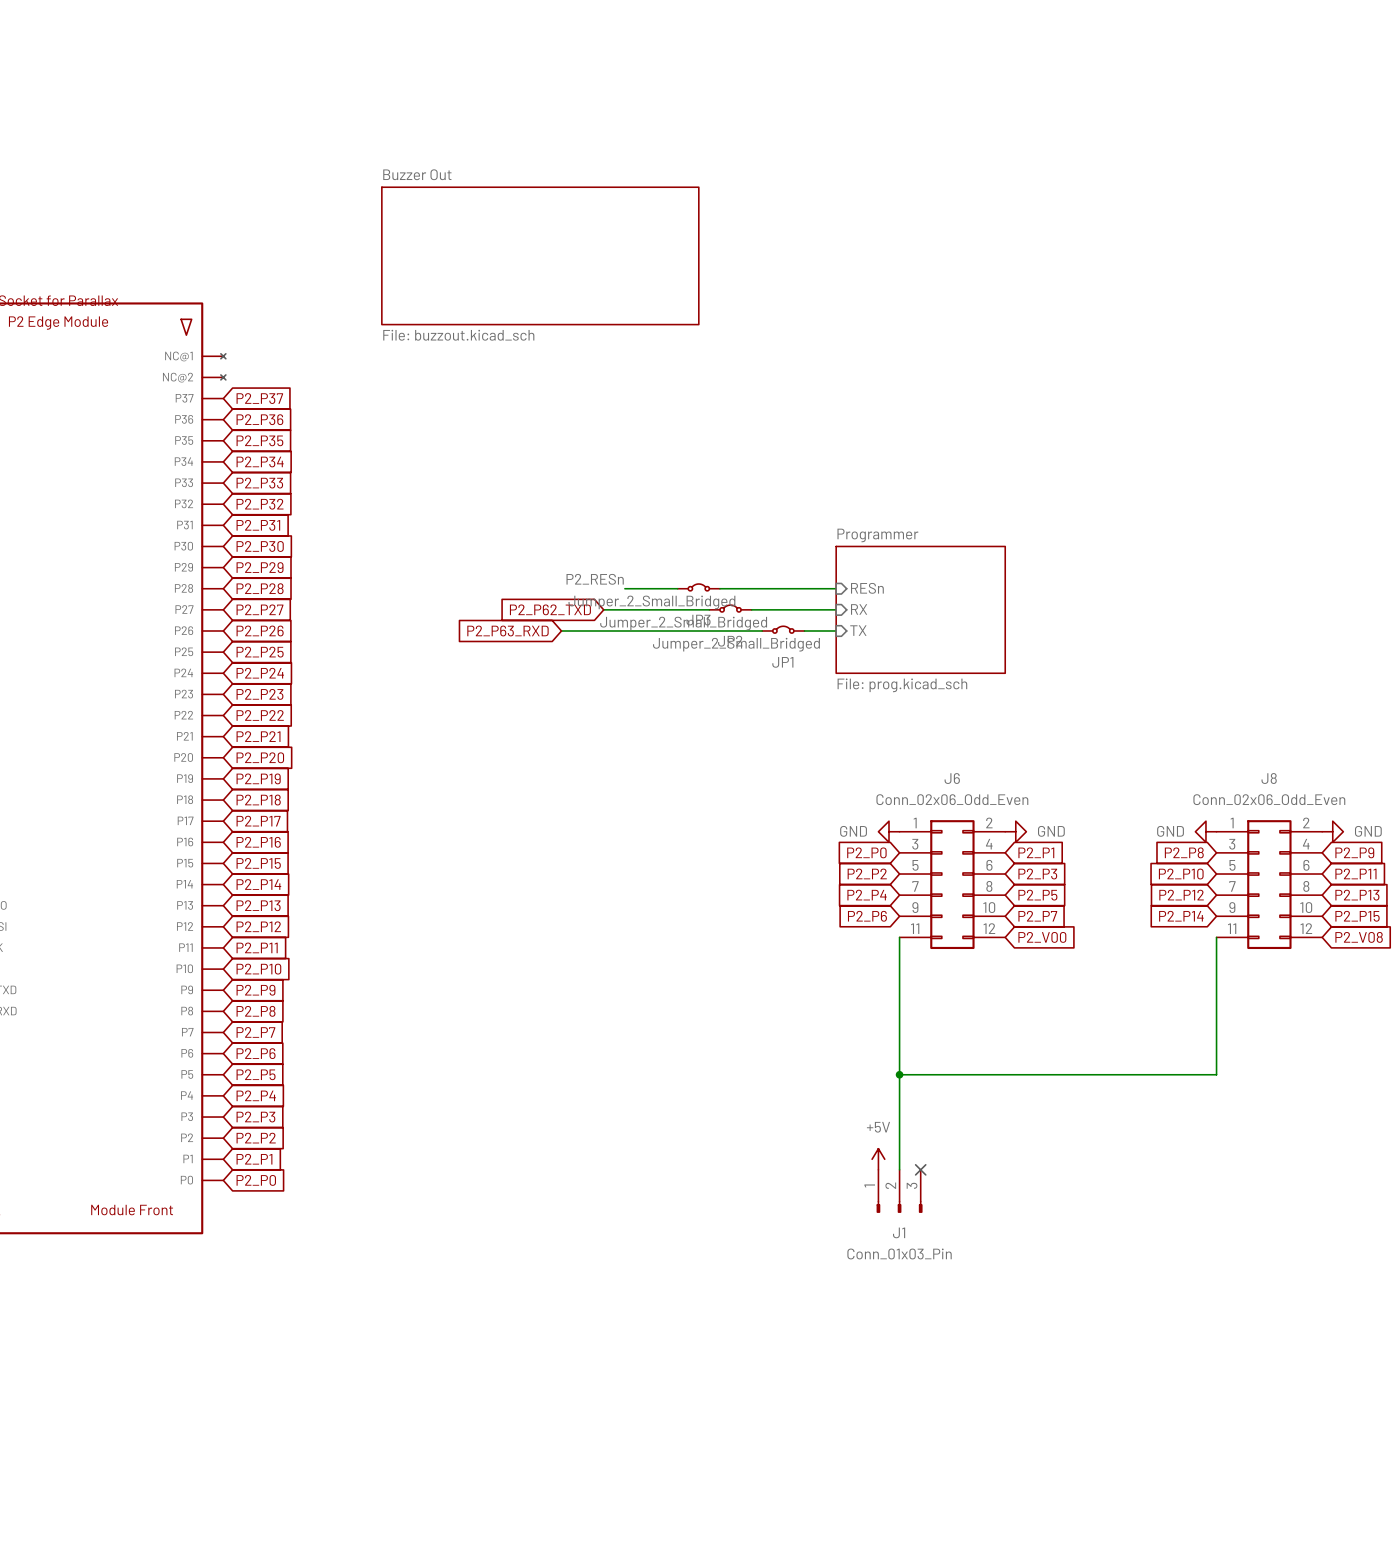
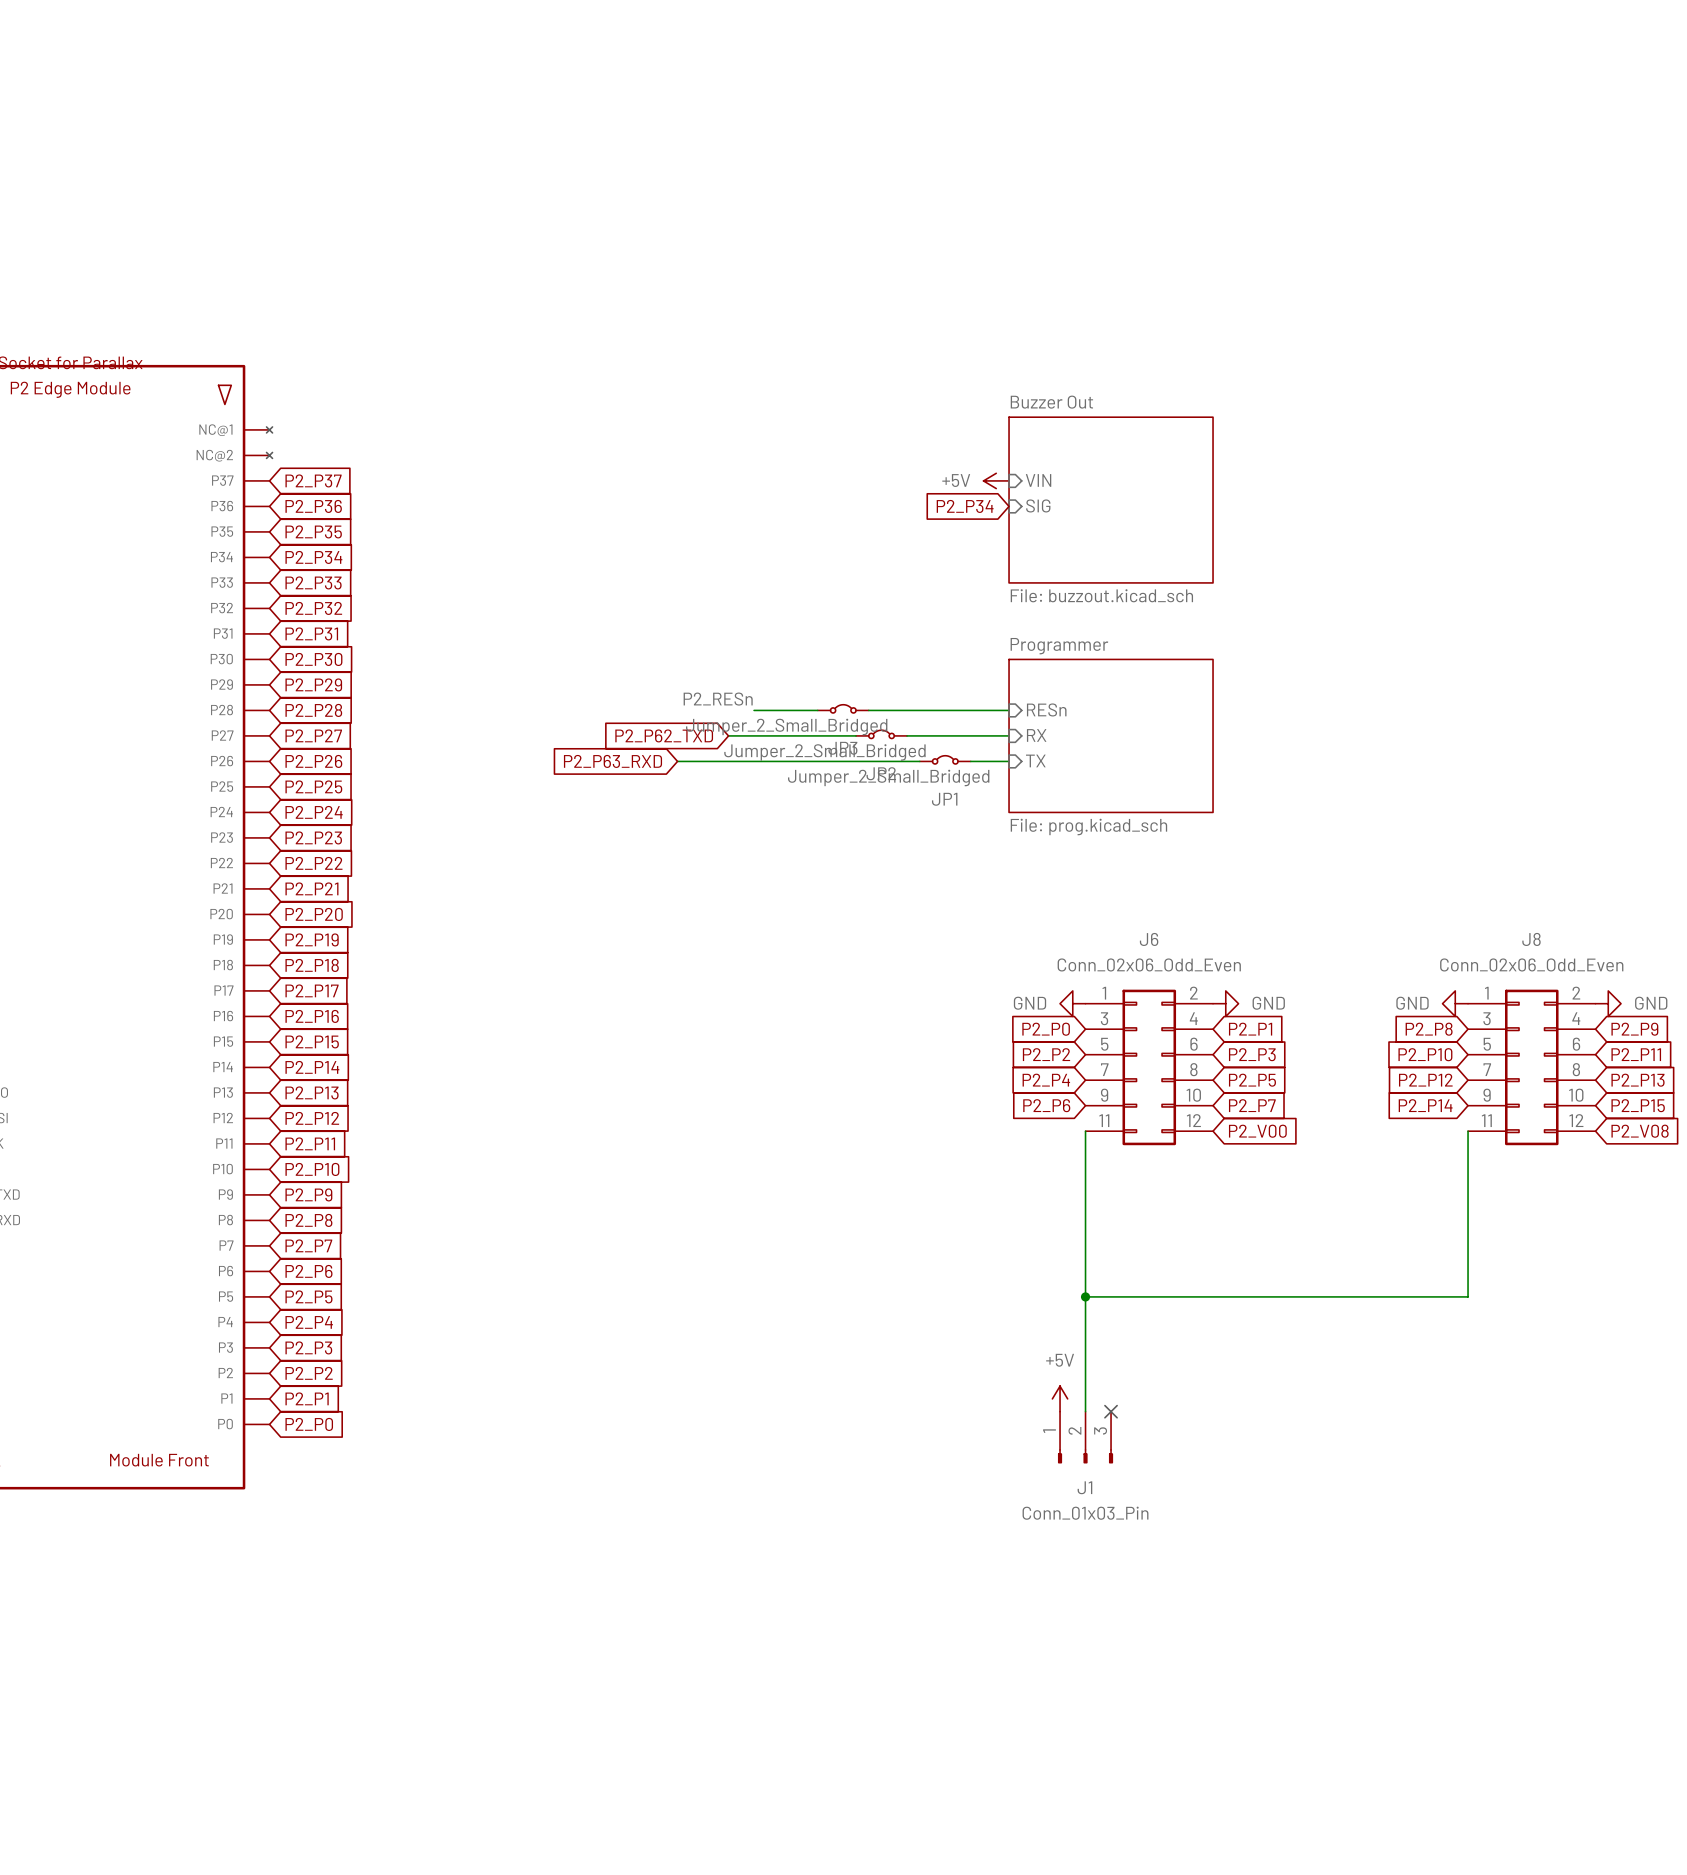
sheet Buzzer Out: File: buzzout.kicad_sch (540, 255) -> none
power symbol: none -> +5V (996, 480)
sheet pin: none -> VIN (1038, 480)
sheet Buzzer Out: none -> File: buzzout.kicad_sch (1111, 500)
global label: none -> P2_P34 (965, 506)
sheet pin: none -> SIG (1038, 505)

